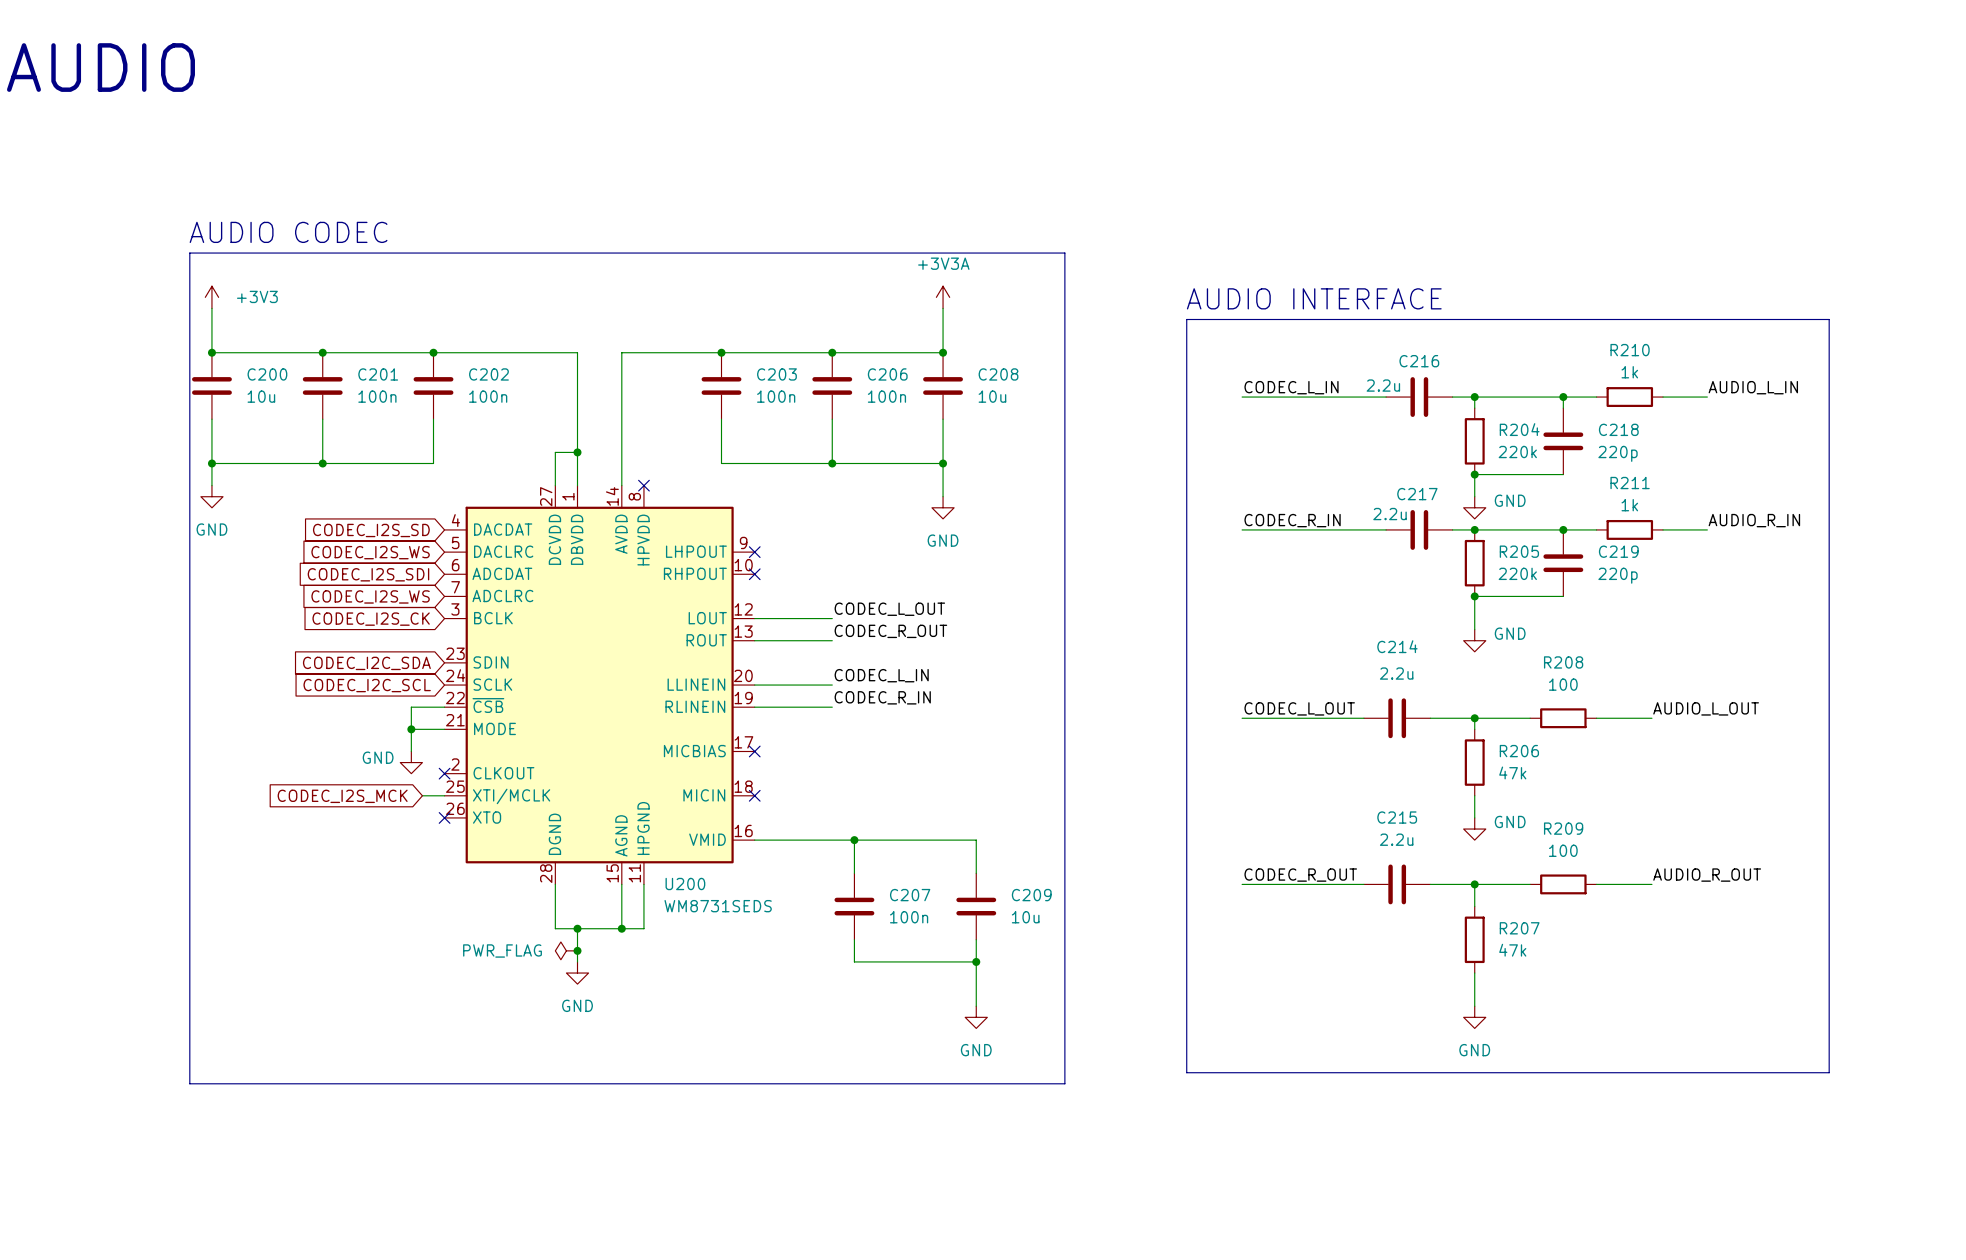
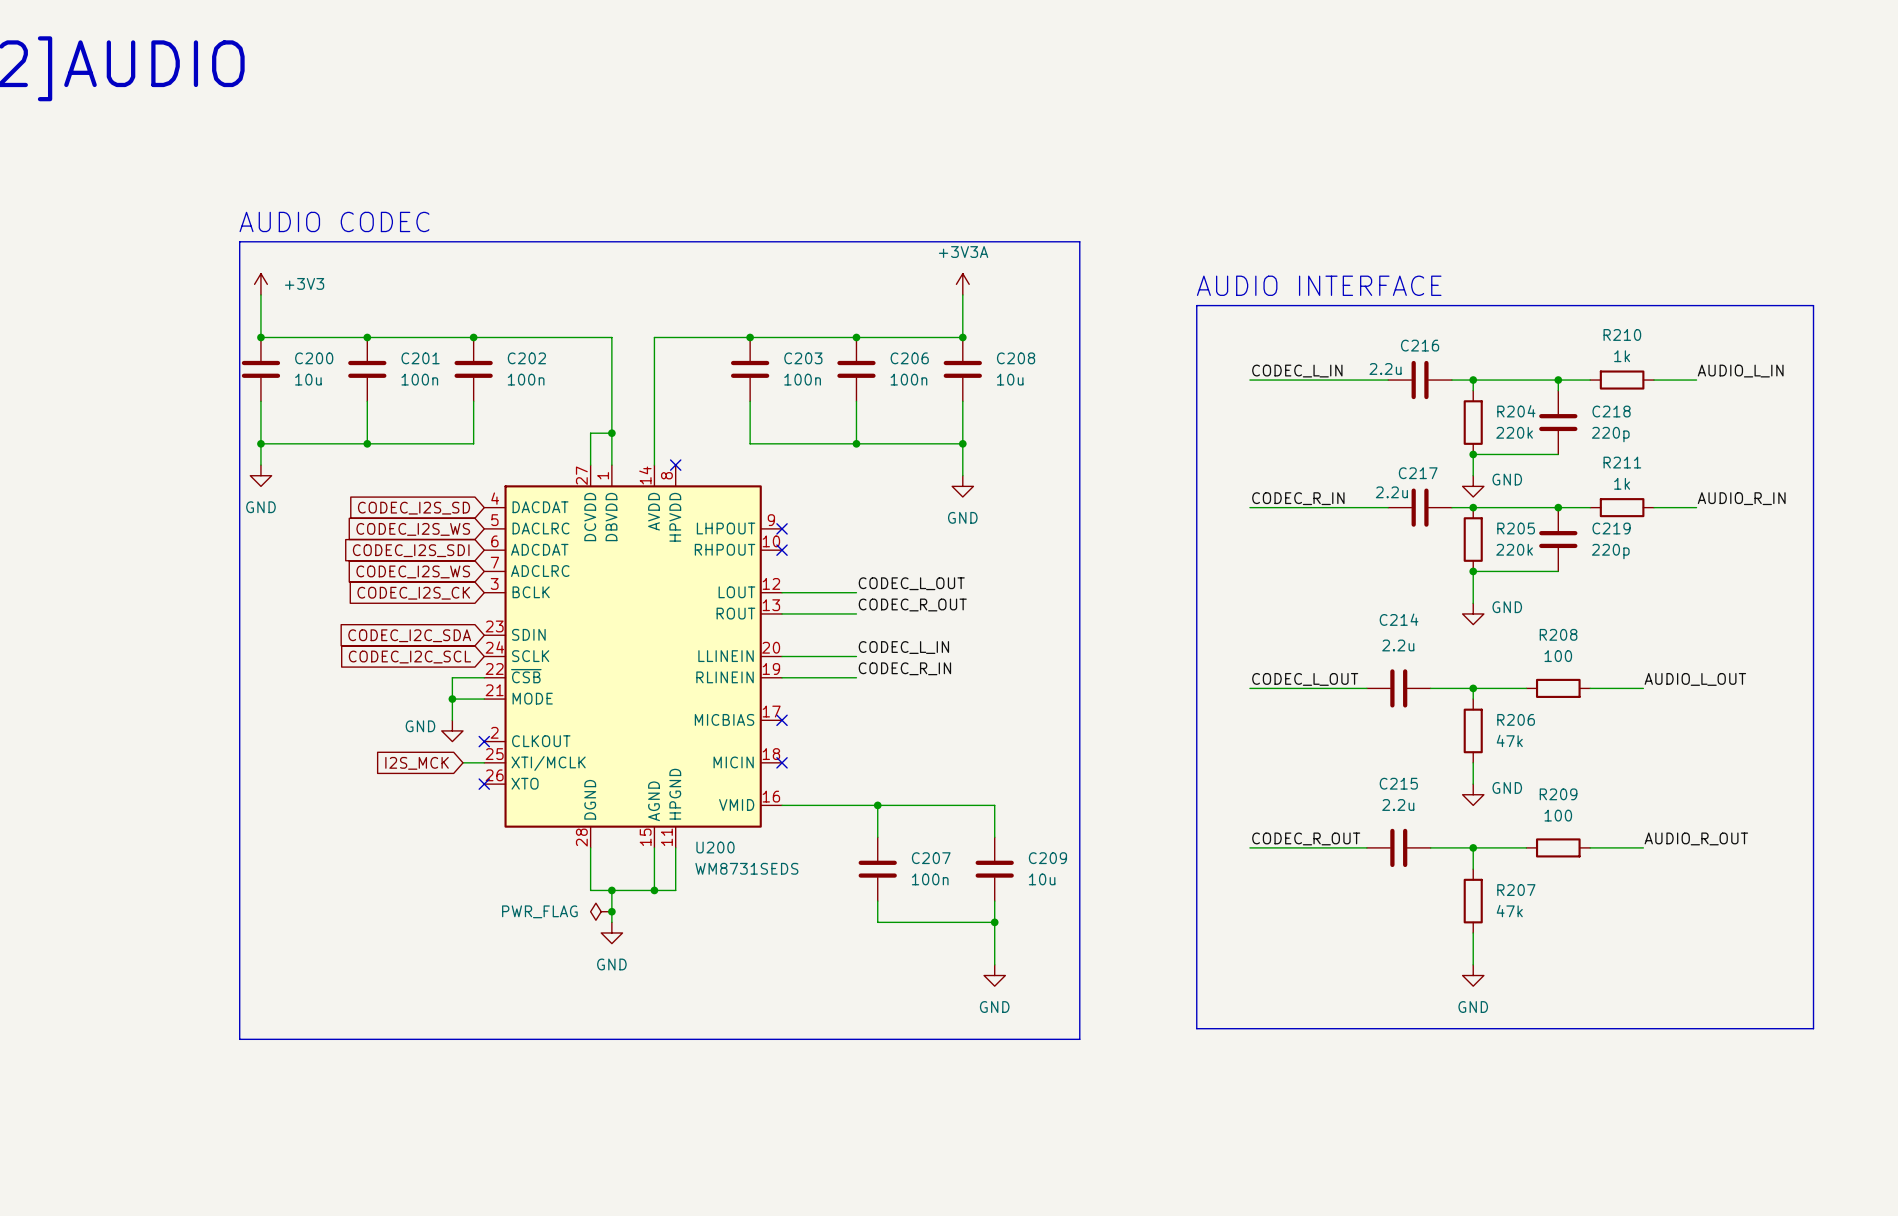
global label: CODEC_I2S_MCK (342, 796) -> I2S_MCK (417, 763)

